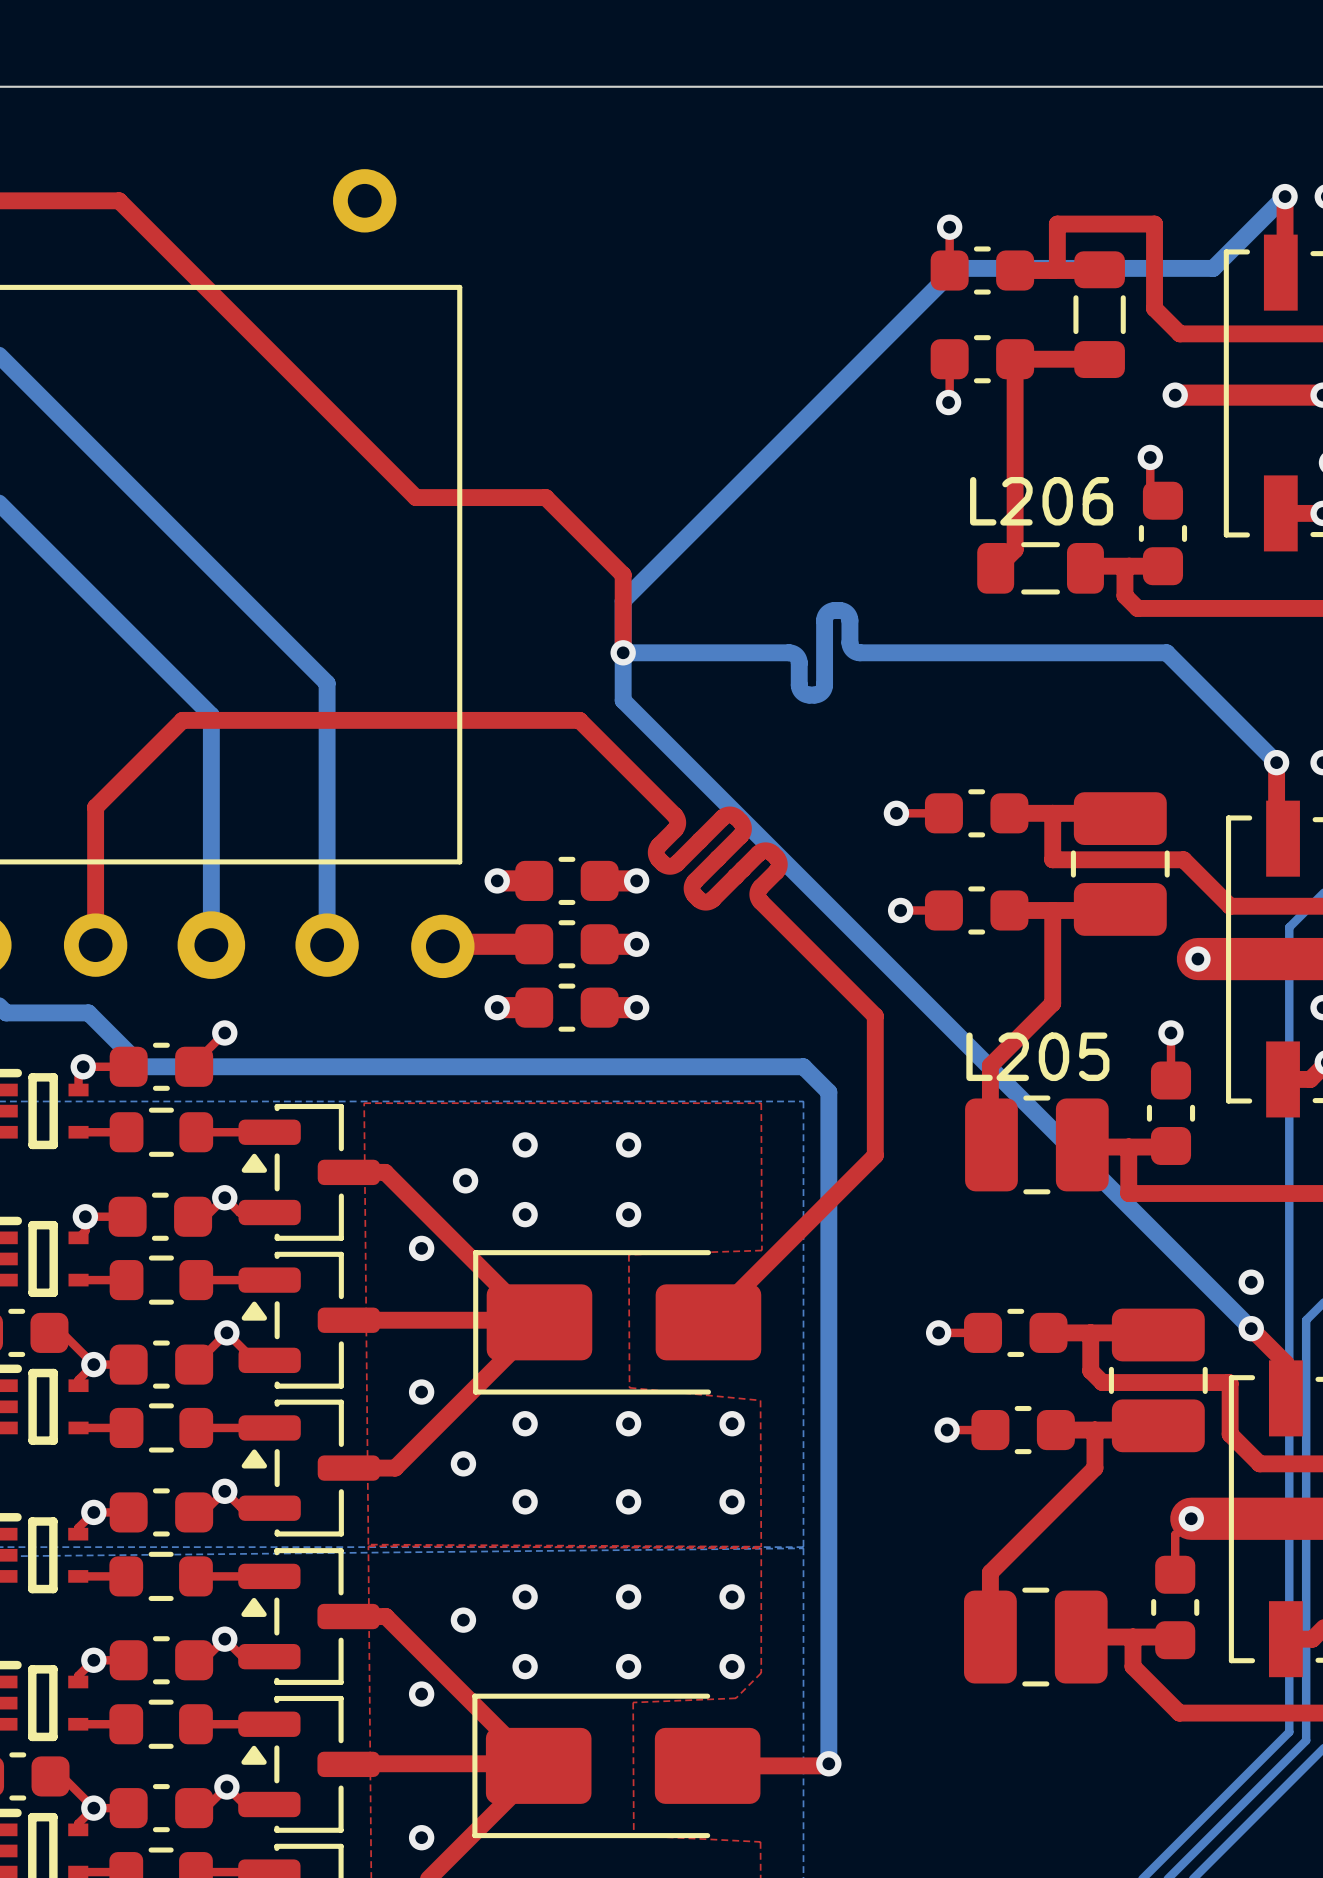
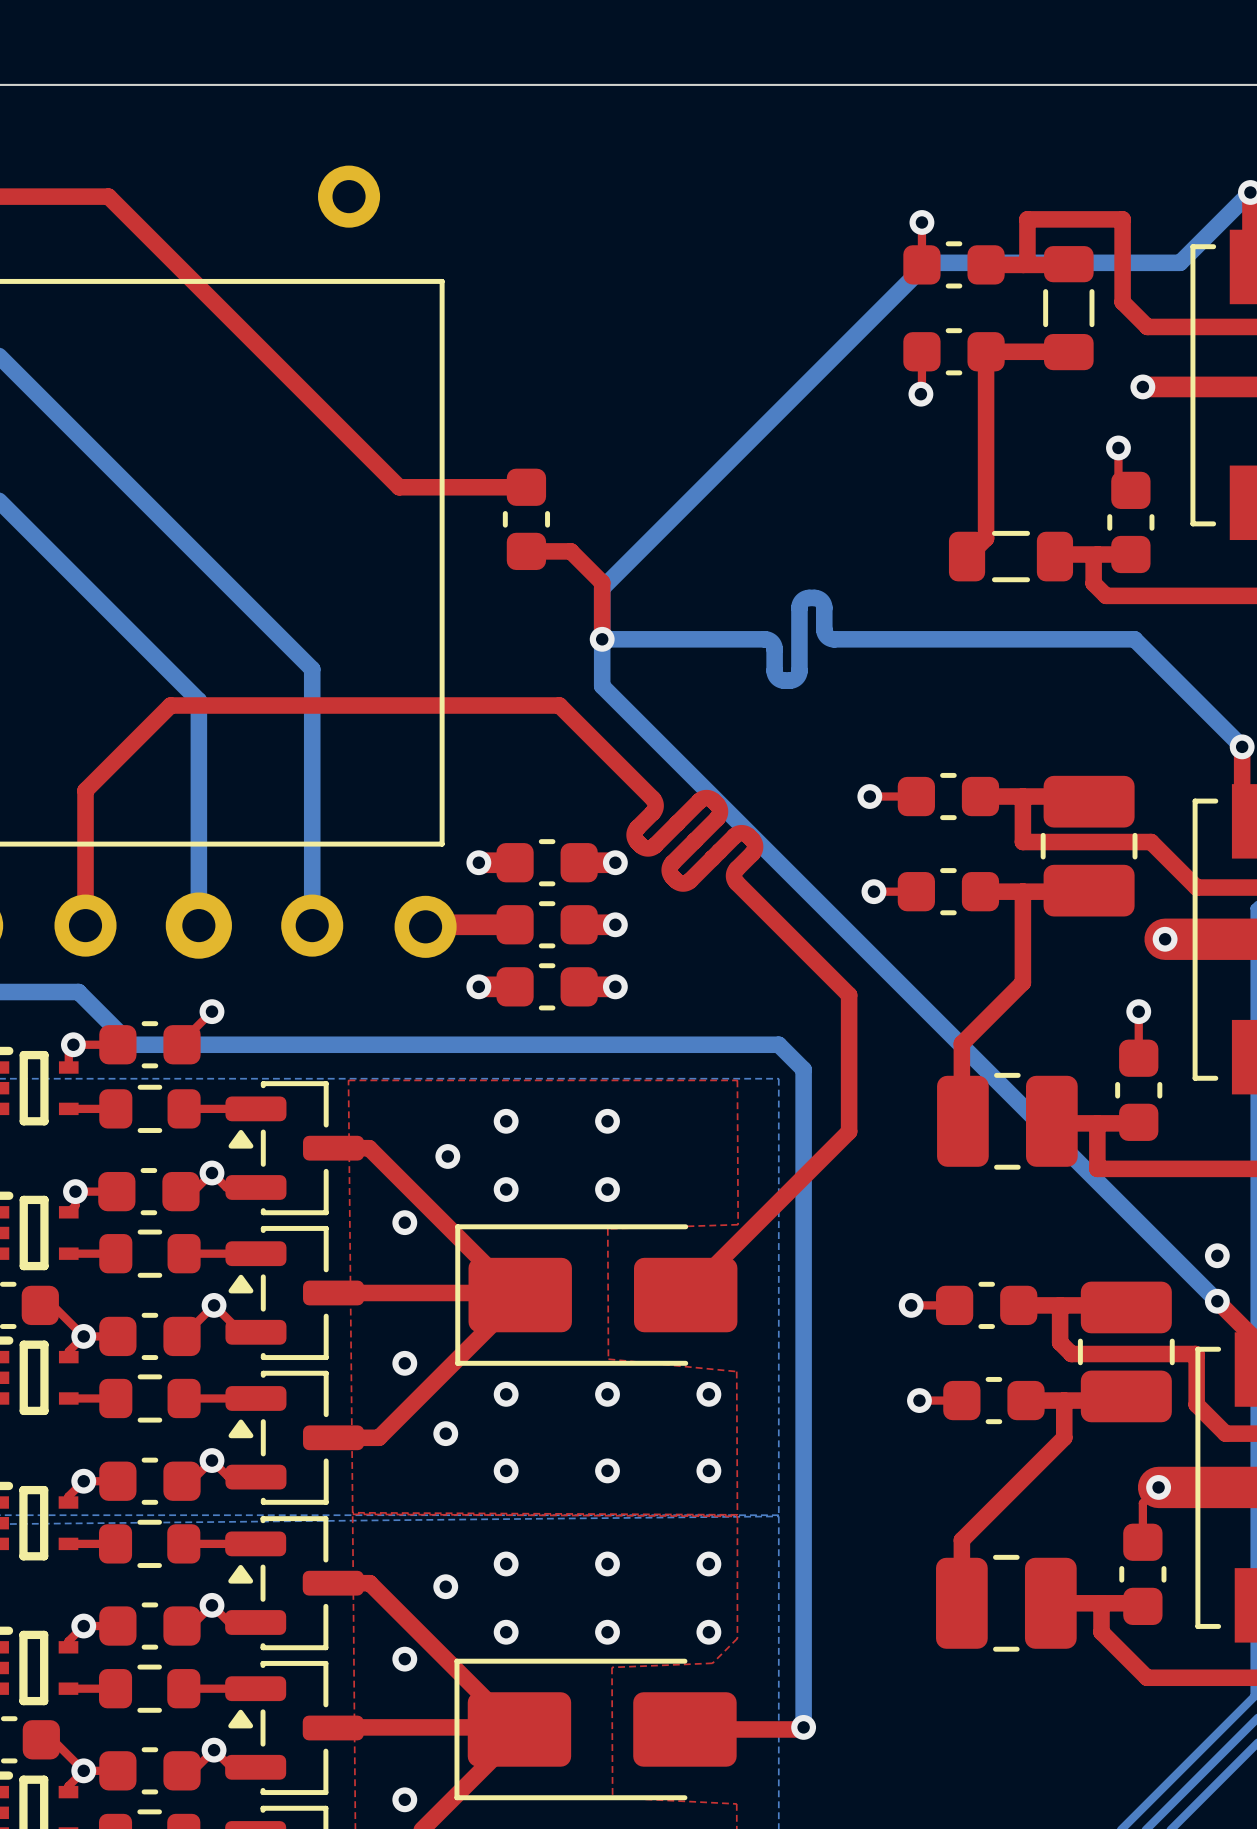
top track: (545, 497) (623, 574) (623, 594) -> (526, 551) (570, 551) (602, 582)
L206 name: L206 (1041, 501) -> none
part: none -> (526, 519)
L205 name: L205 (1037, 1056) -> none

